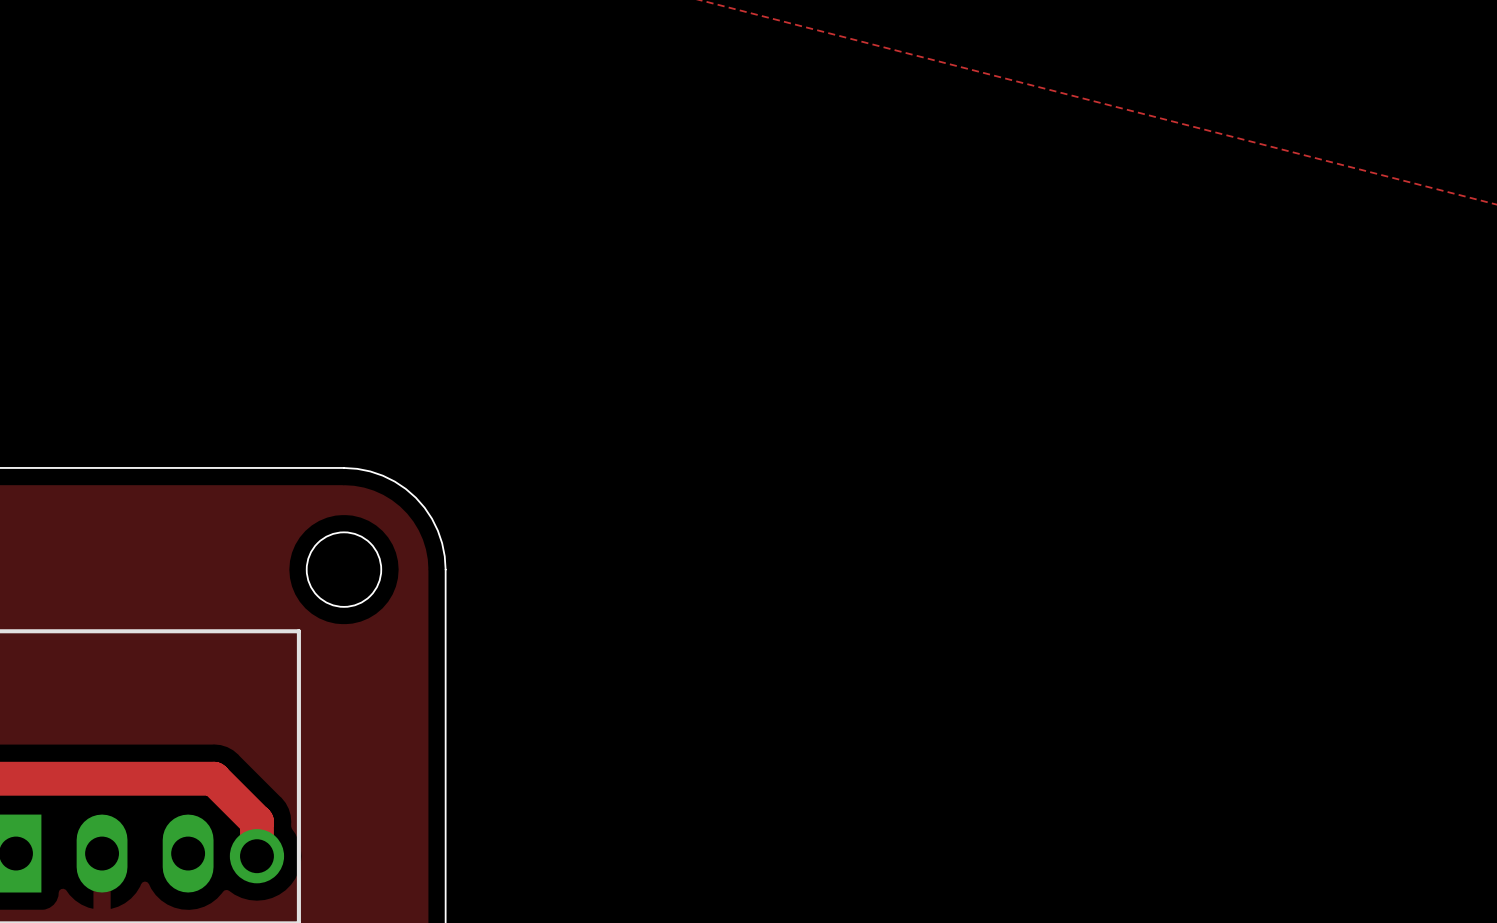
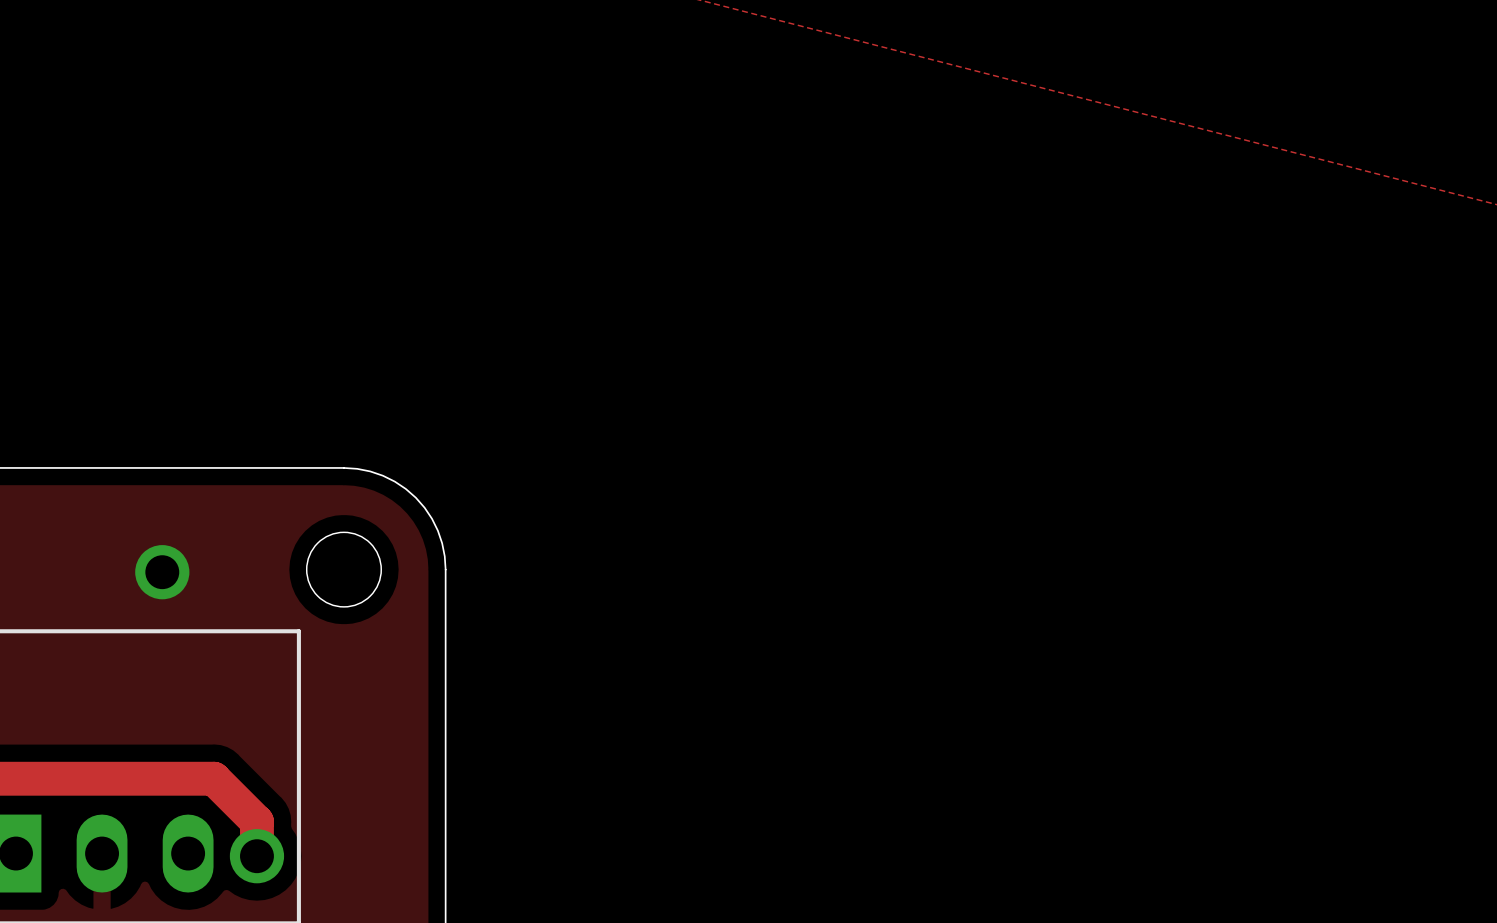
via: none -> (162, 572)

